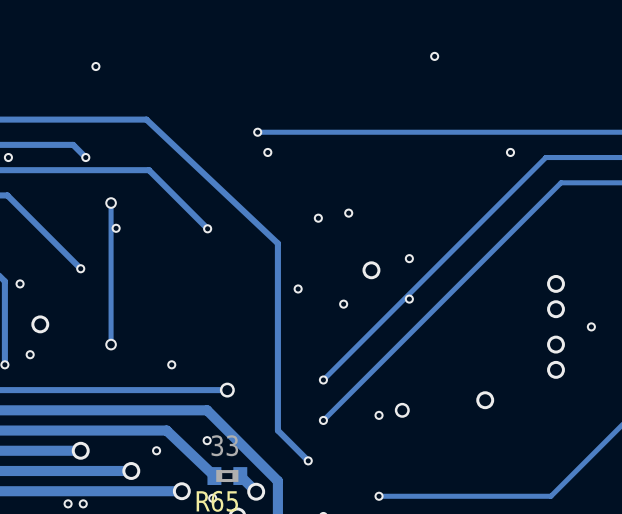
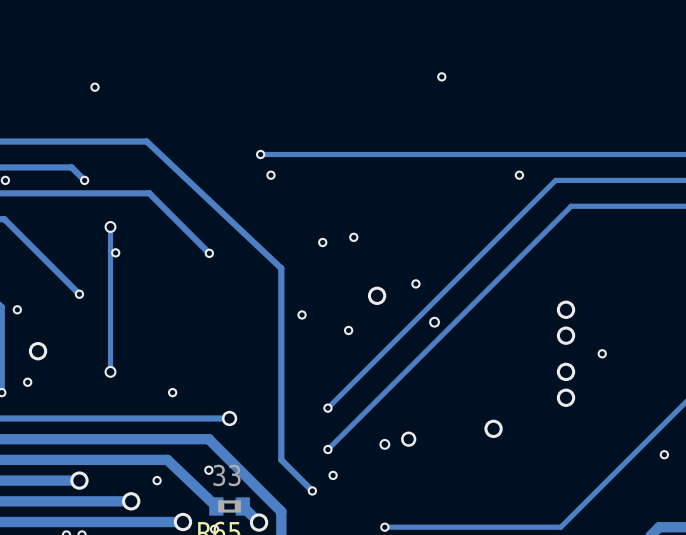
via: none -> (434, 322)
via: (409, 299) -> none
via position: (379, 415) -> (333, 475)
via: none -> (384, 444)

